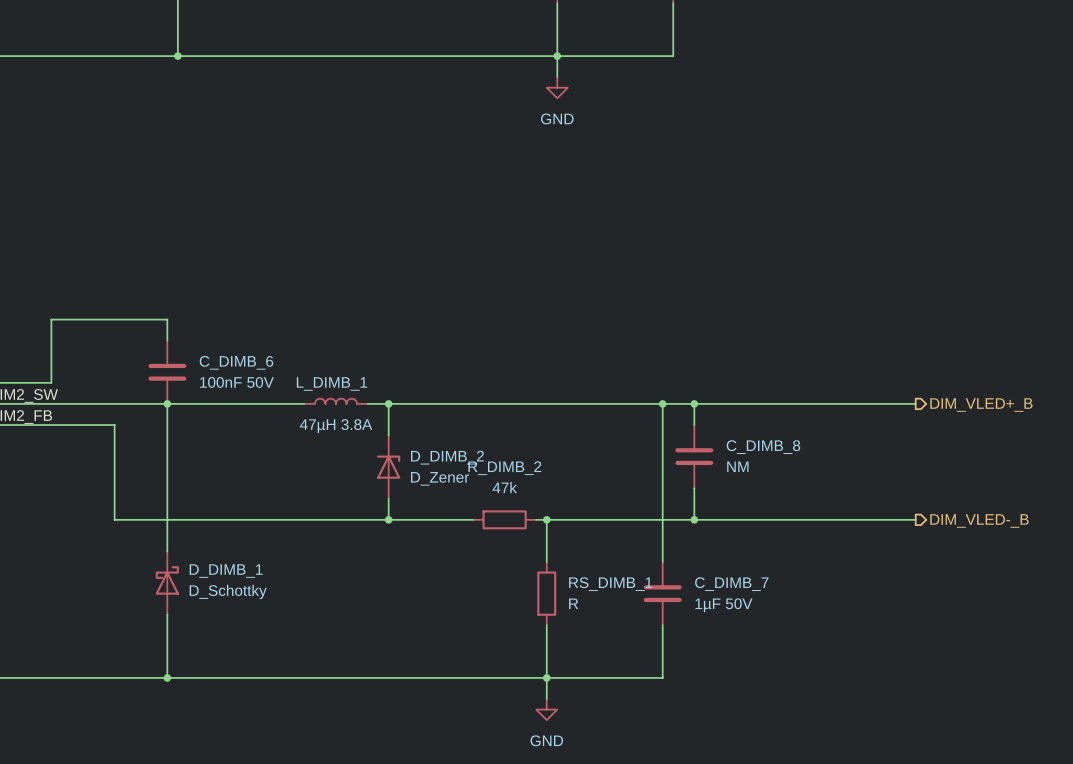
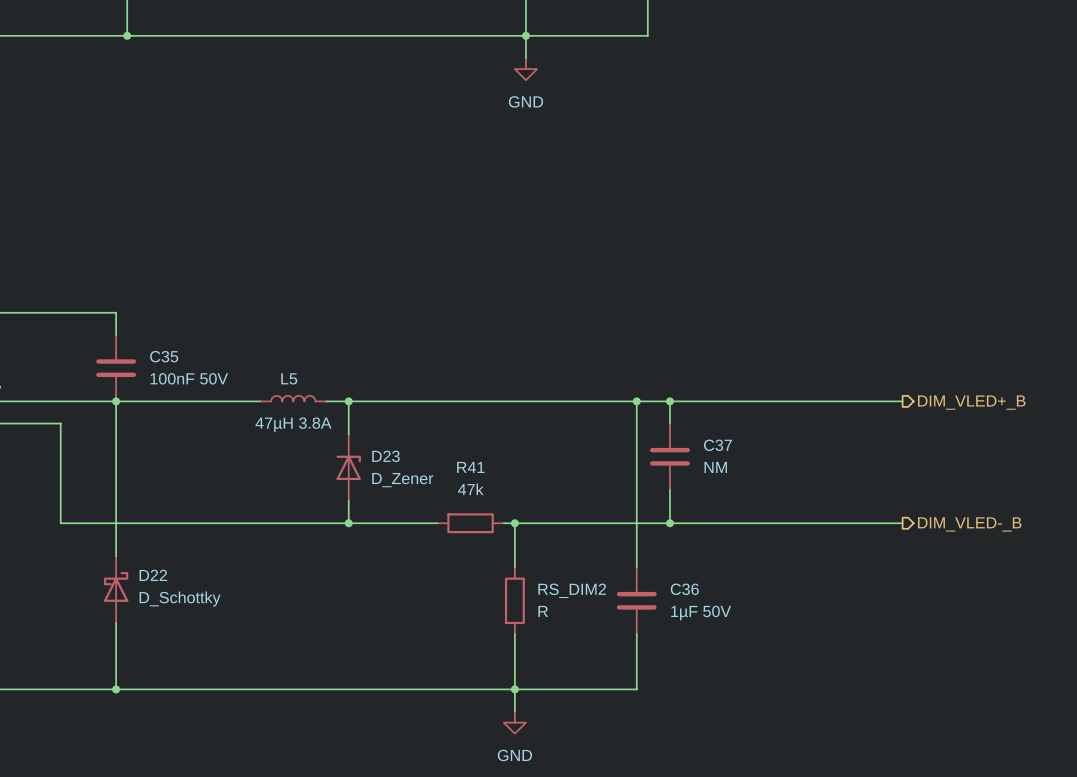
C_DIMB_6 name: C_DIMB_6 (236, 362) -> C35 (164, 356)
L_DIMB_1 name: L_DIMB_1 (332, 383) -> L5 (289, 378)
C_DIMB_8 name: C_DIMB_8 (763, 447) -> C37 (717, 445)
D_DIMB_2 name: D_DIMB_2 (447, 457) -> D23 (385, 456)
R_DIMB_2 name: R_DIMB_2 (504, 468) -> R41 (470, 467)
D_DIMB_1 name: D_DIMB_1 (226, 571) -> D22 (153, 575)
RS_DIMB_1 name: RS_DIMB_1 (610, 584) -> RS_DIM2 (572, 590)
C_DIMB_7 name: C_DIMB_7 (731, 584) -> C36 (684, 589)

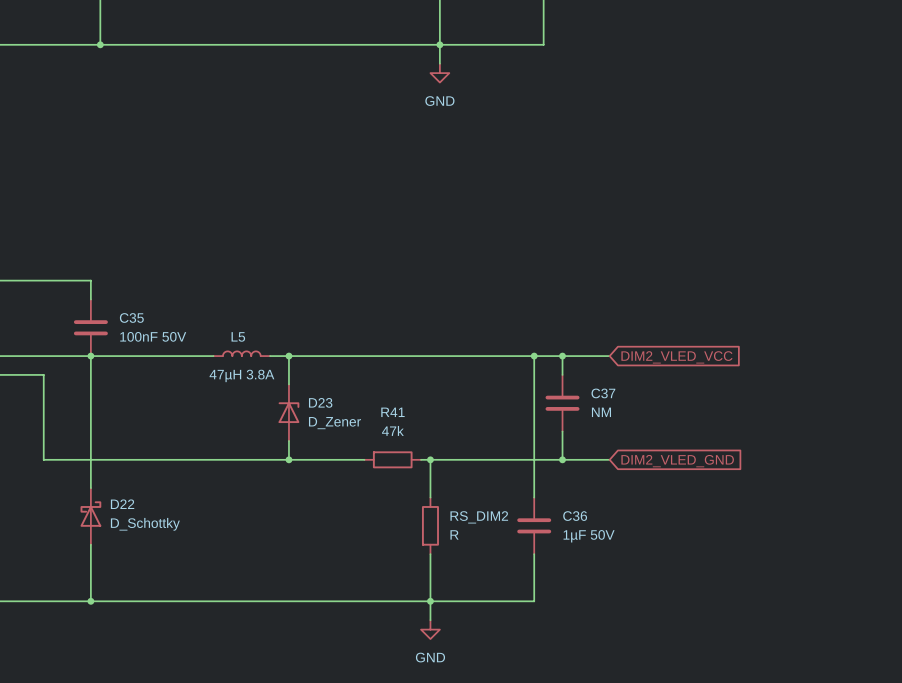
wire: (725, 401) (902, 401) -> none
global label: none -> DIM2_VLED_VCC (676, 357)
hierarchical label: DIM_VLED+_B (971, 402) -> none
wire: (725, 523) (902, 523) -> none
global label: none -> DIM2_VLED_GND (677, 461)
hierarchical label: DIM_VLED-_B (969, 524) -> none

